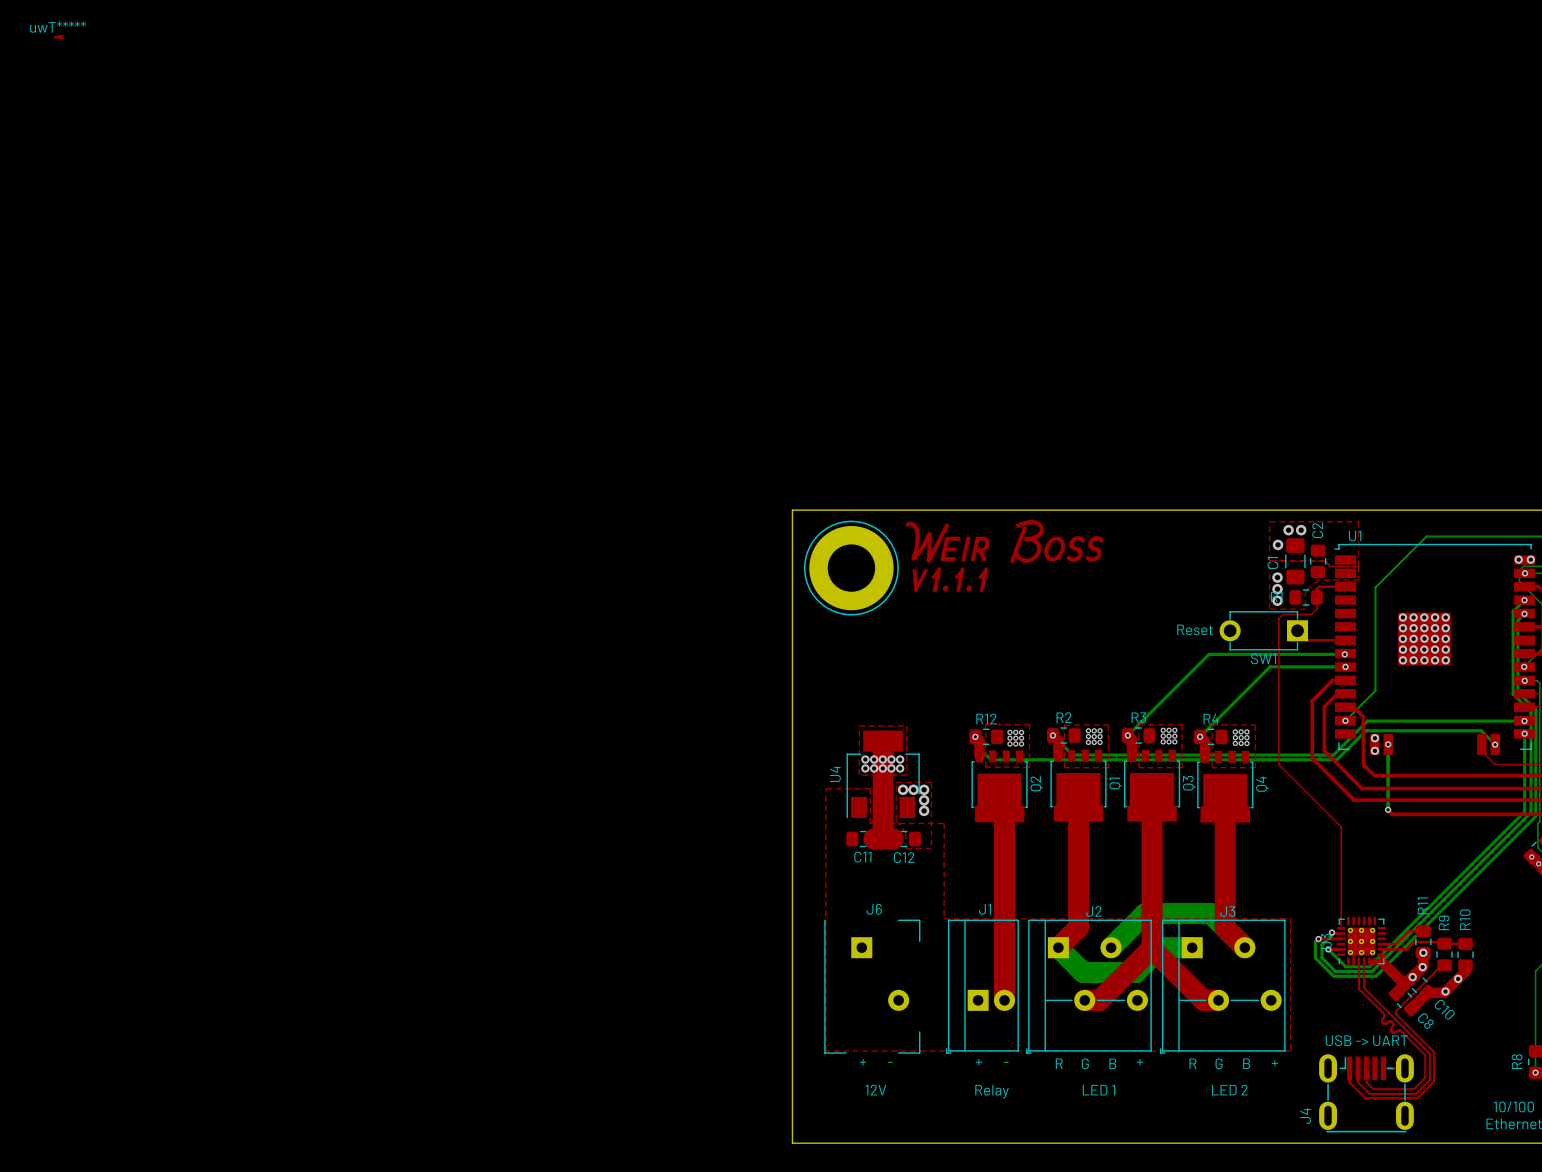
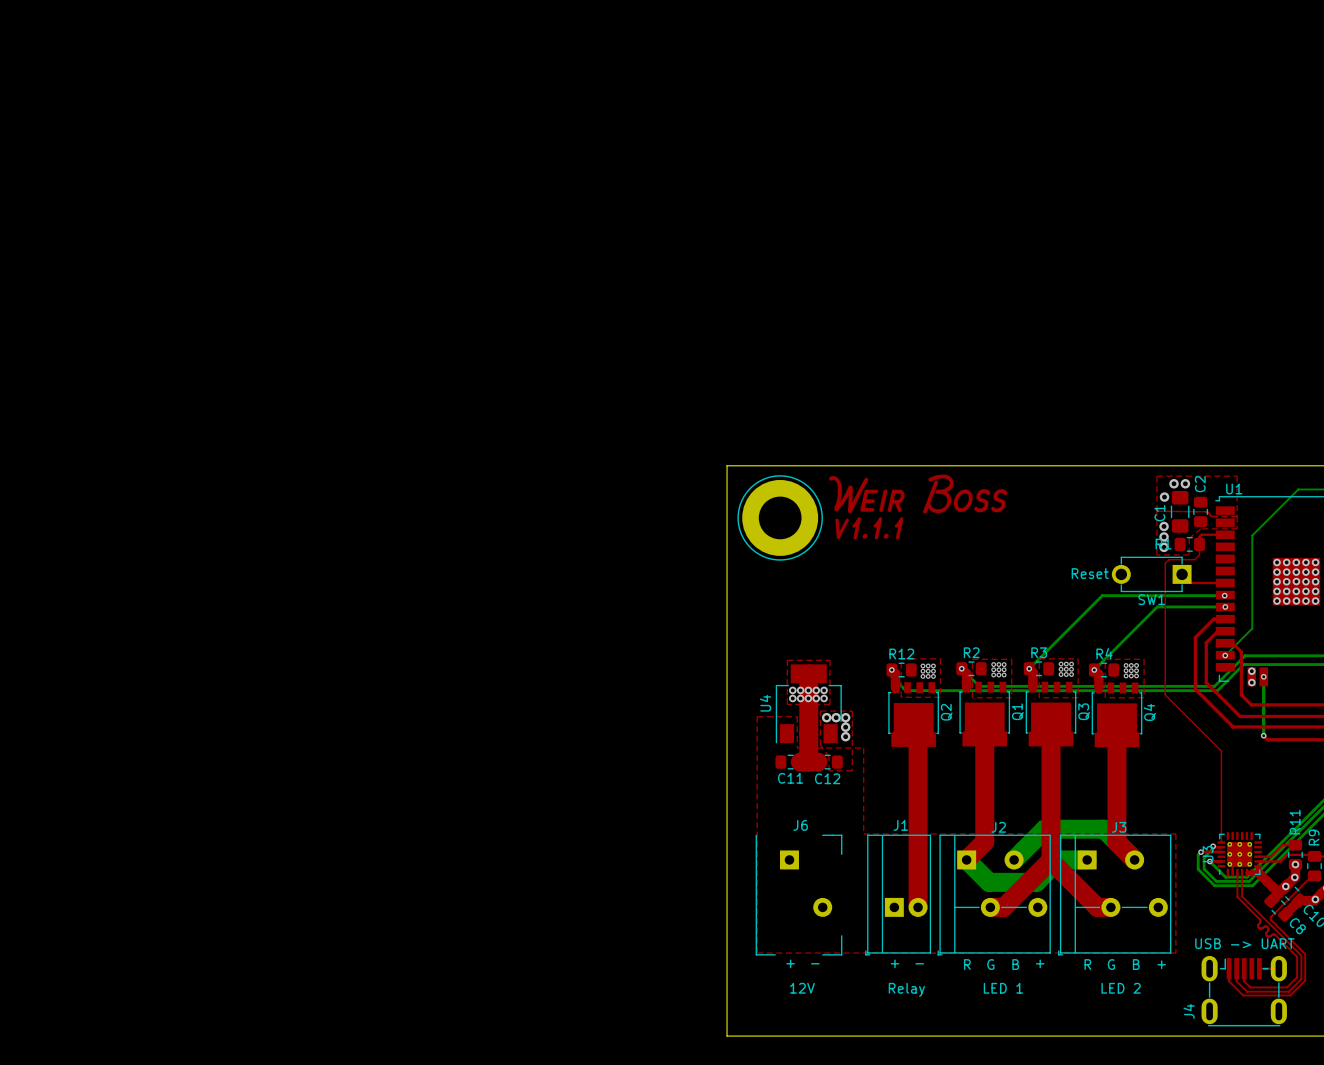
uwT*****: (58, 37) -> none

